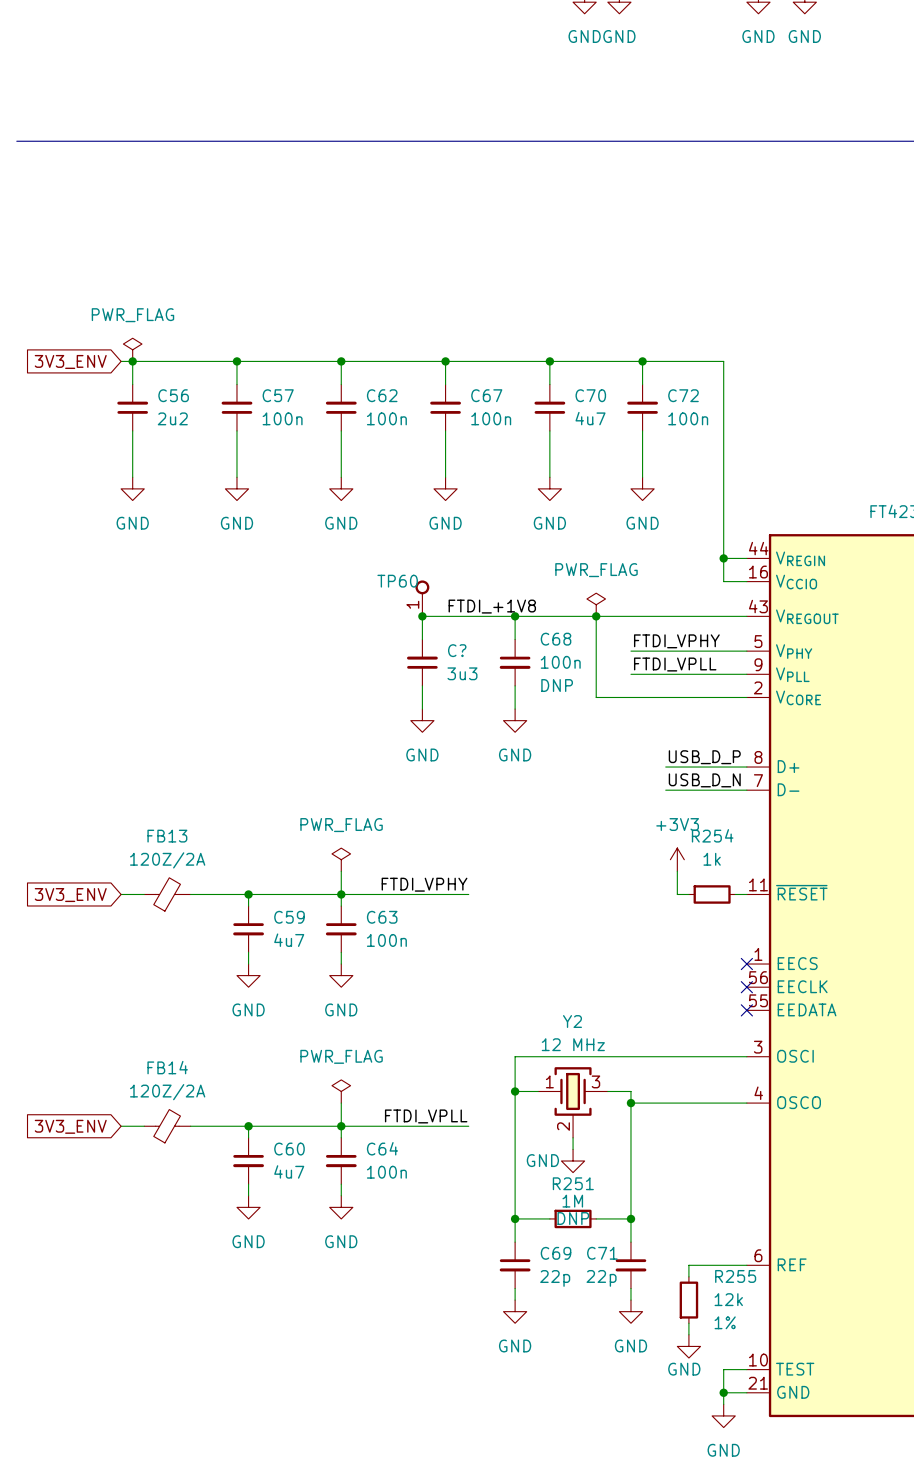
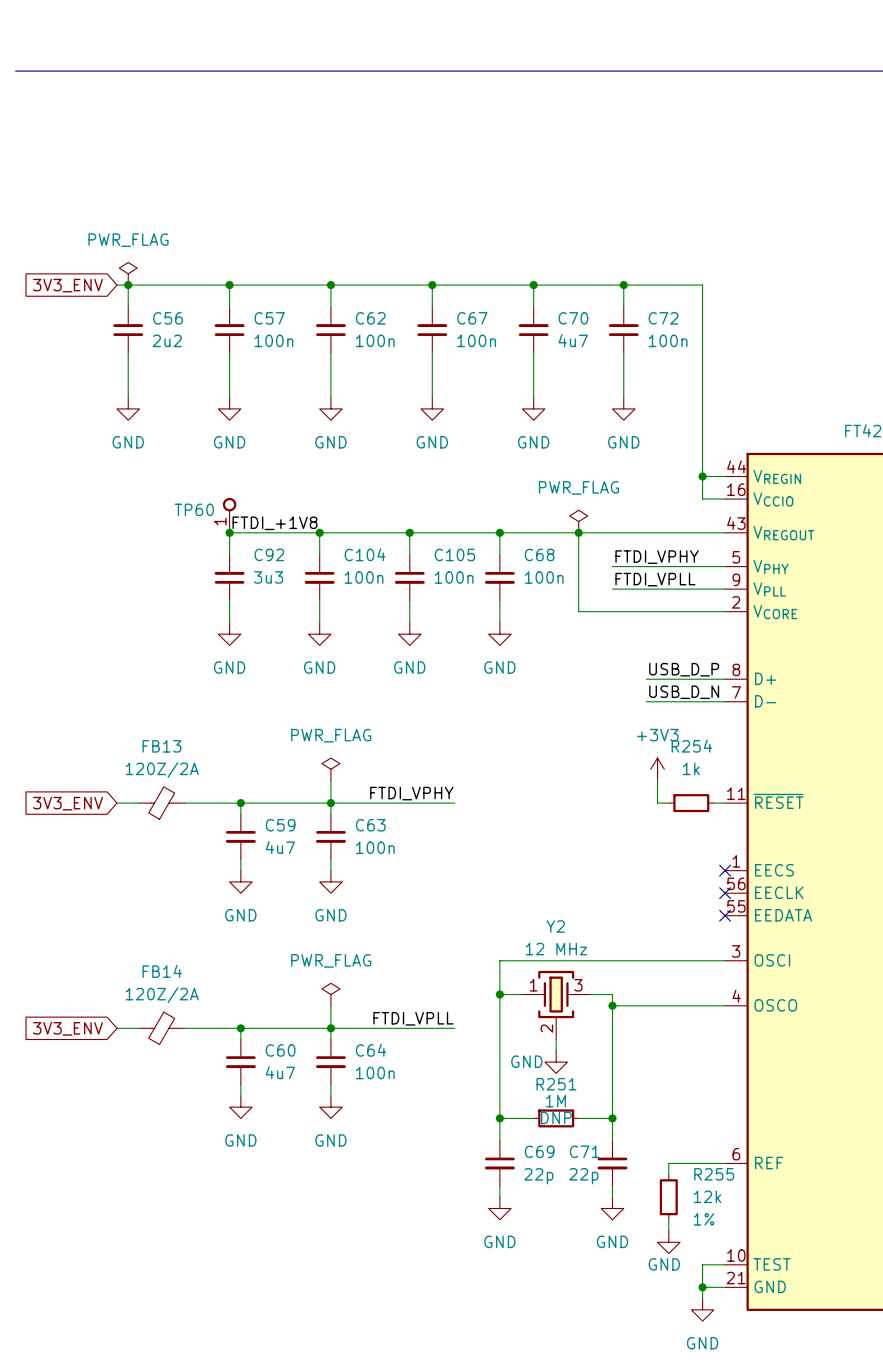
TP60 name position: TP60 (397, 581) -> TP60 (194, 509)
TP60 position: (422, 598) -> (229, 515)
label position: FTDI_+1V8 (492, 606) -> FTDI_+1V8 (274, 523)
junction: none -> (229, 532)
wire: none -> (319, 532) (319, 555)
junction: none -> (319, 532)
wire: none -> (409, 532) (229, 532) (229, 555)
C92: none -> (229, 577)
C104: none -> (319, 577)
C?: (422, 662) -> none
C105: none -> (409, 577)
wire: none -> (229, 600) (229, 622)
wire: none -> (319, 600) (319, 622)
C68 text: DNP (557, 685) -> none
power symbol: none -> GND (229, 634)
power symbol: none -> GND (319, 634)

